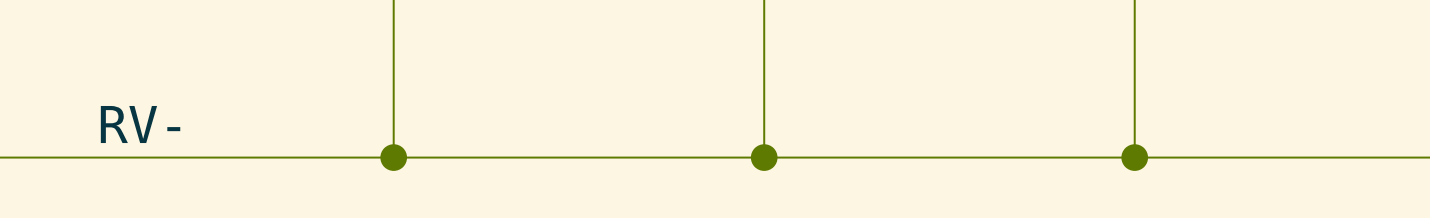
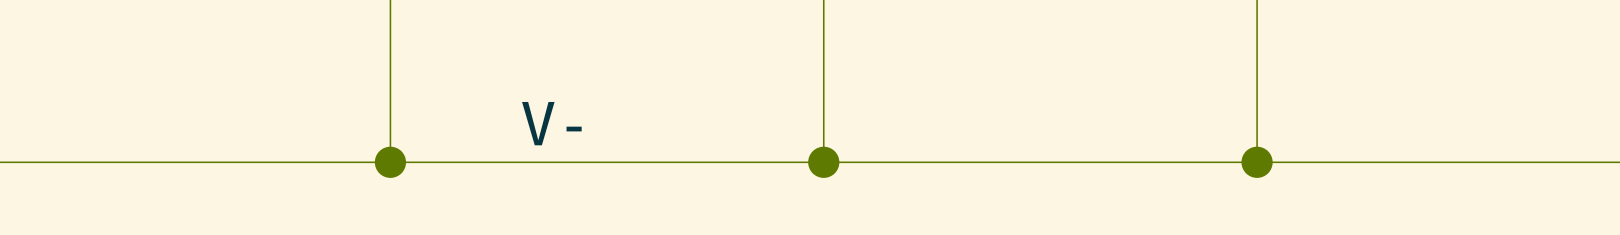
label: RV- (140, 124) -> none
label: none -> V- (551, 123)

